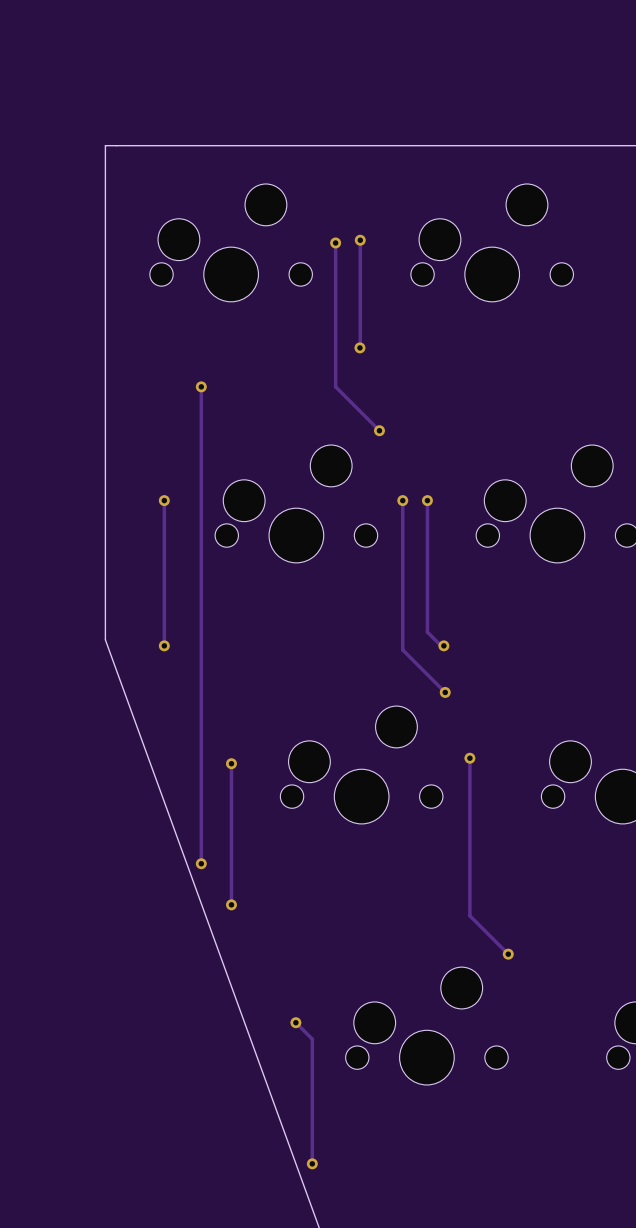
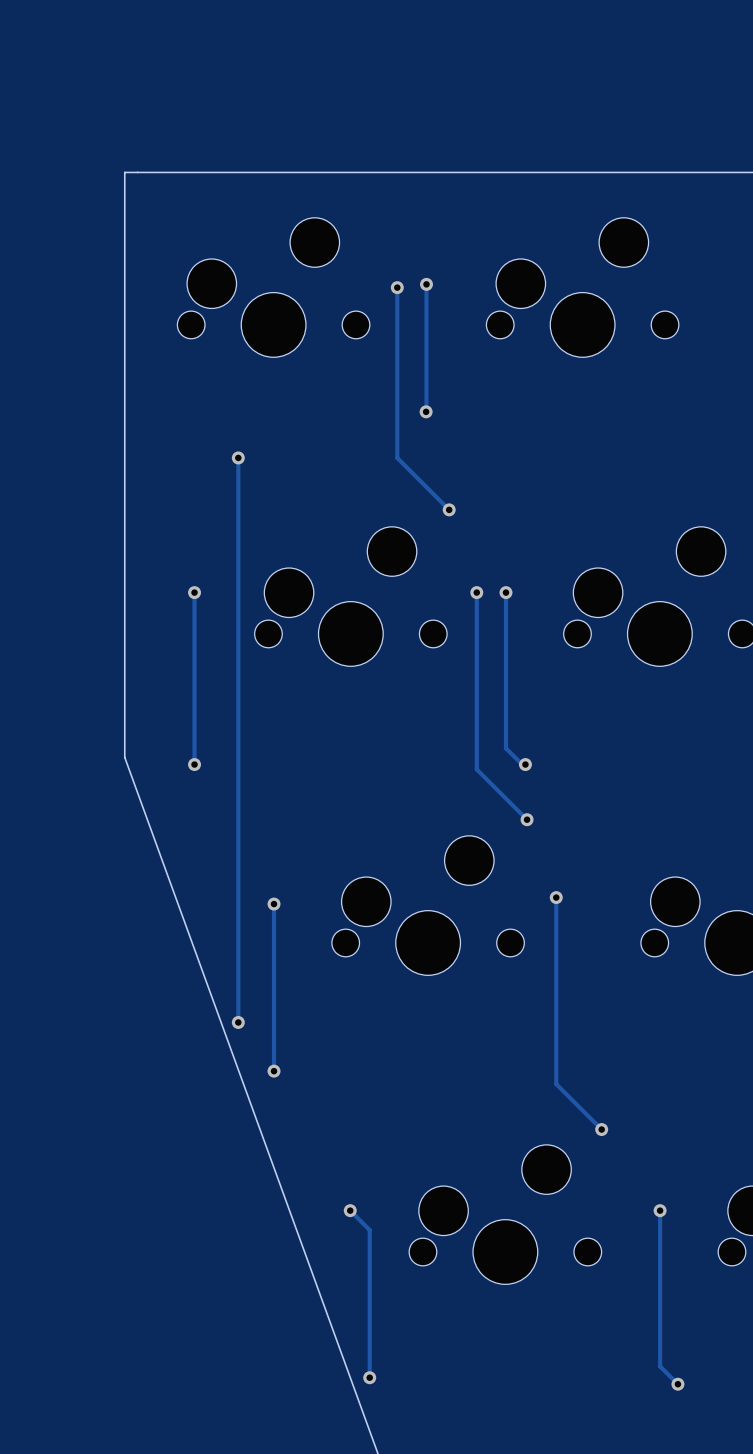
track: none -> (660, 1210) (660, 1366) (677, 1384)
via: none -> (660, 1210)
via: none -> (677, 1384)

